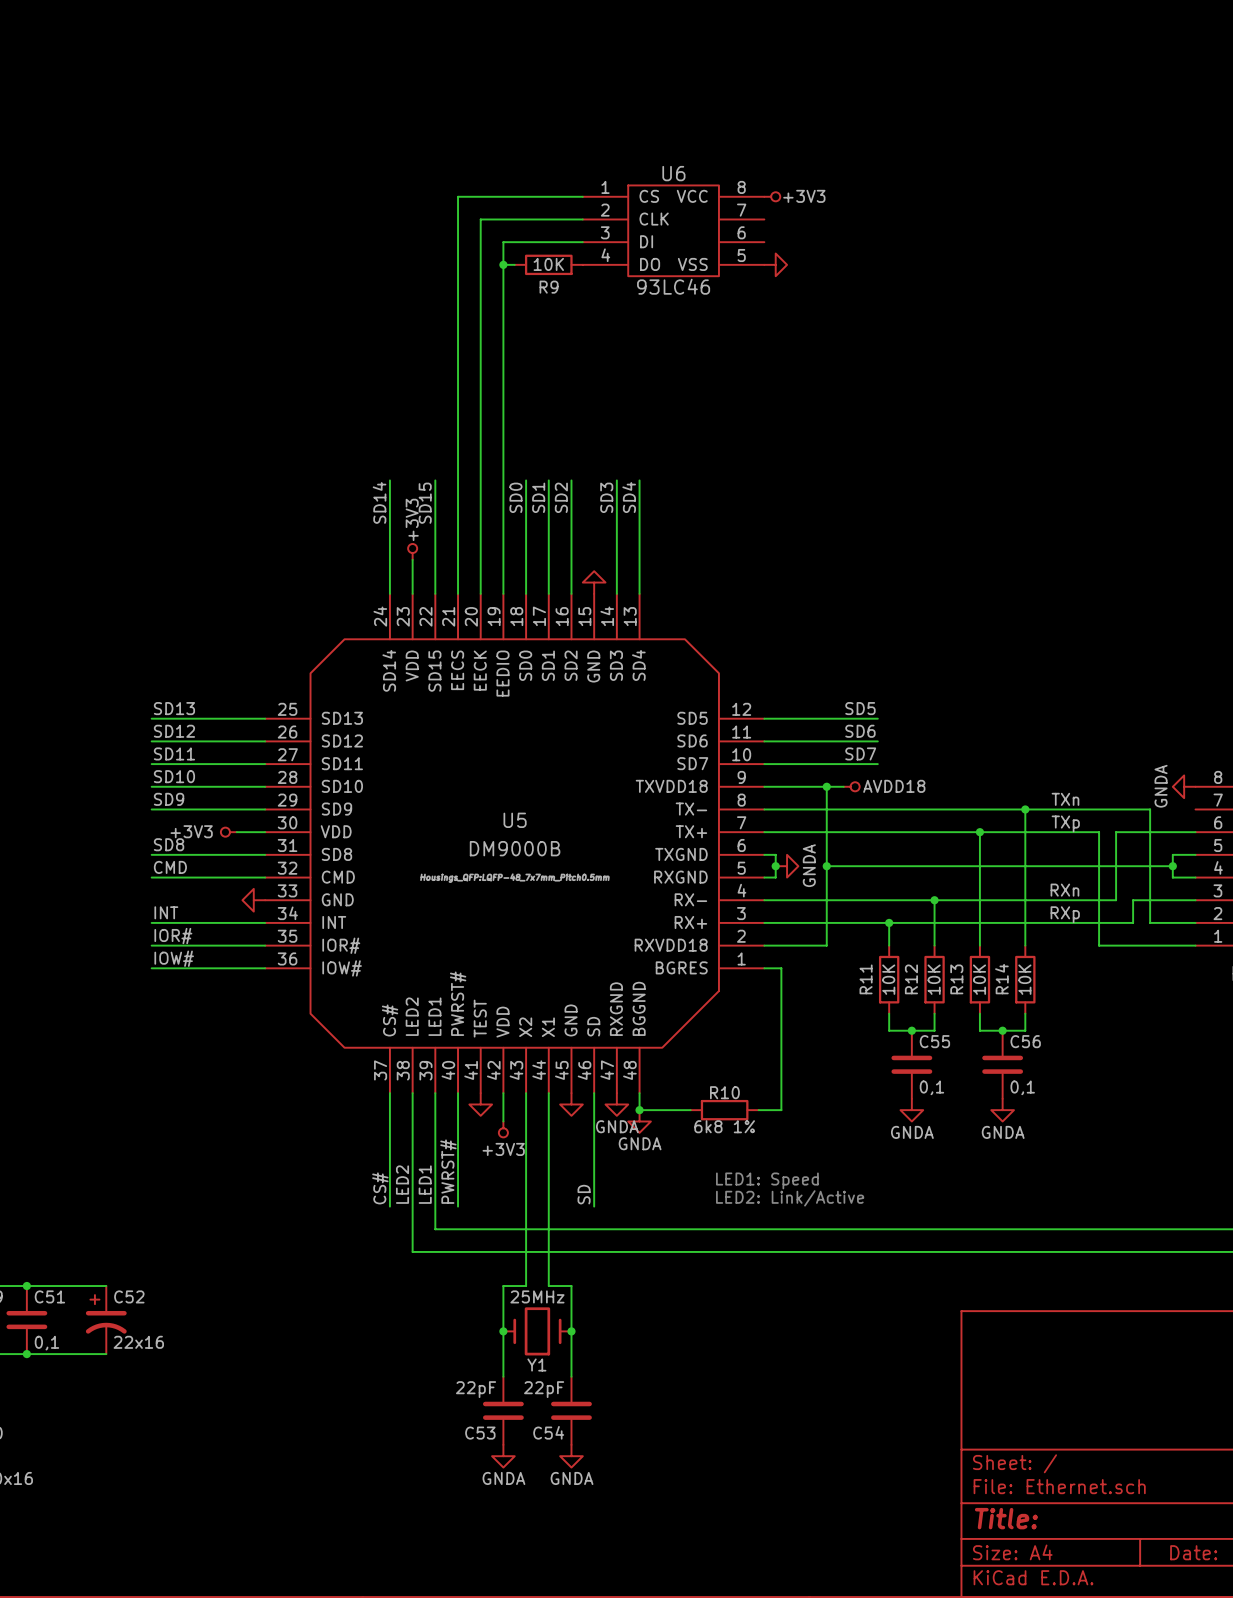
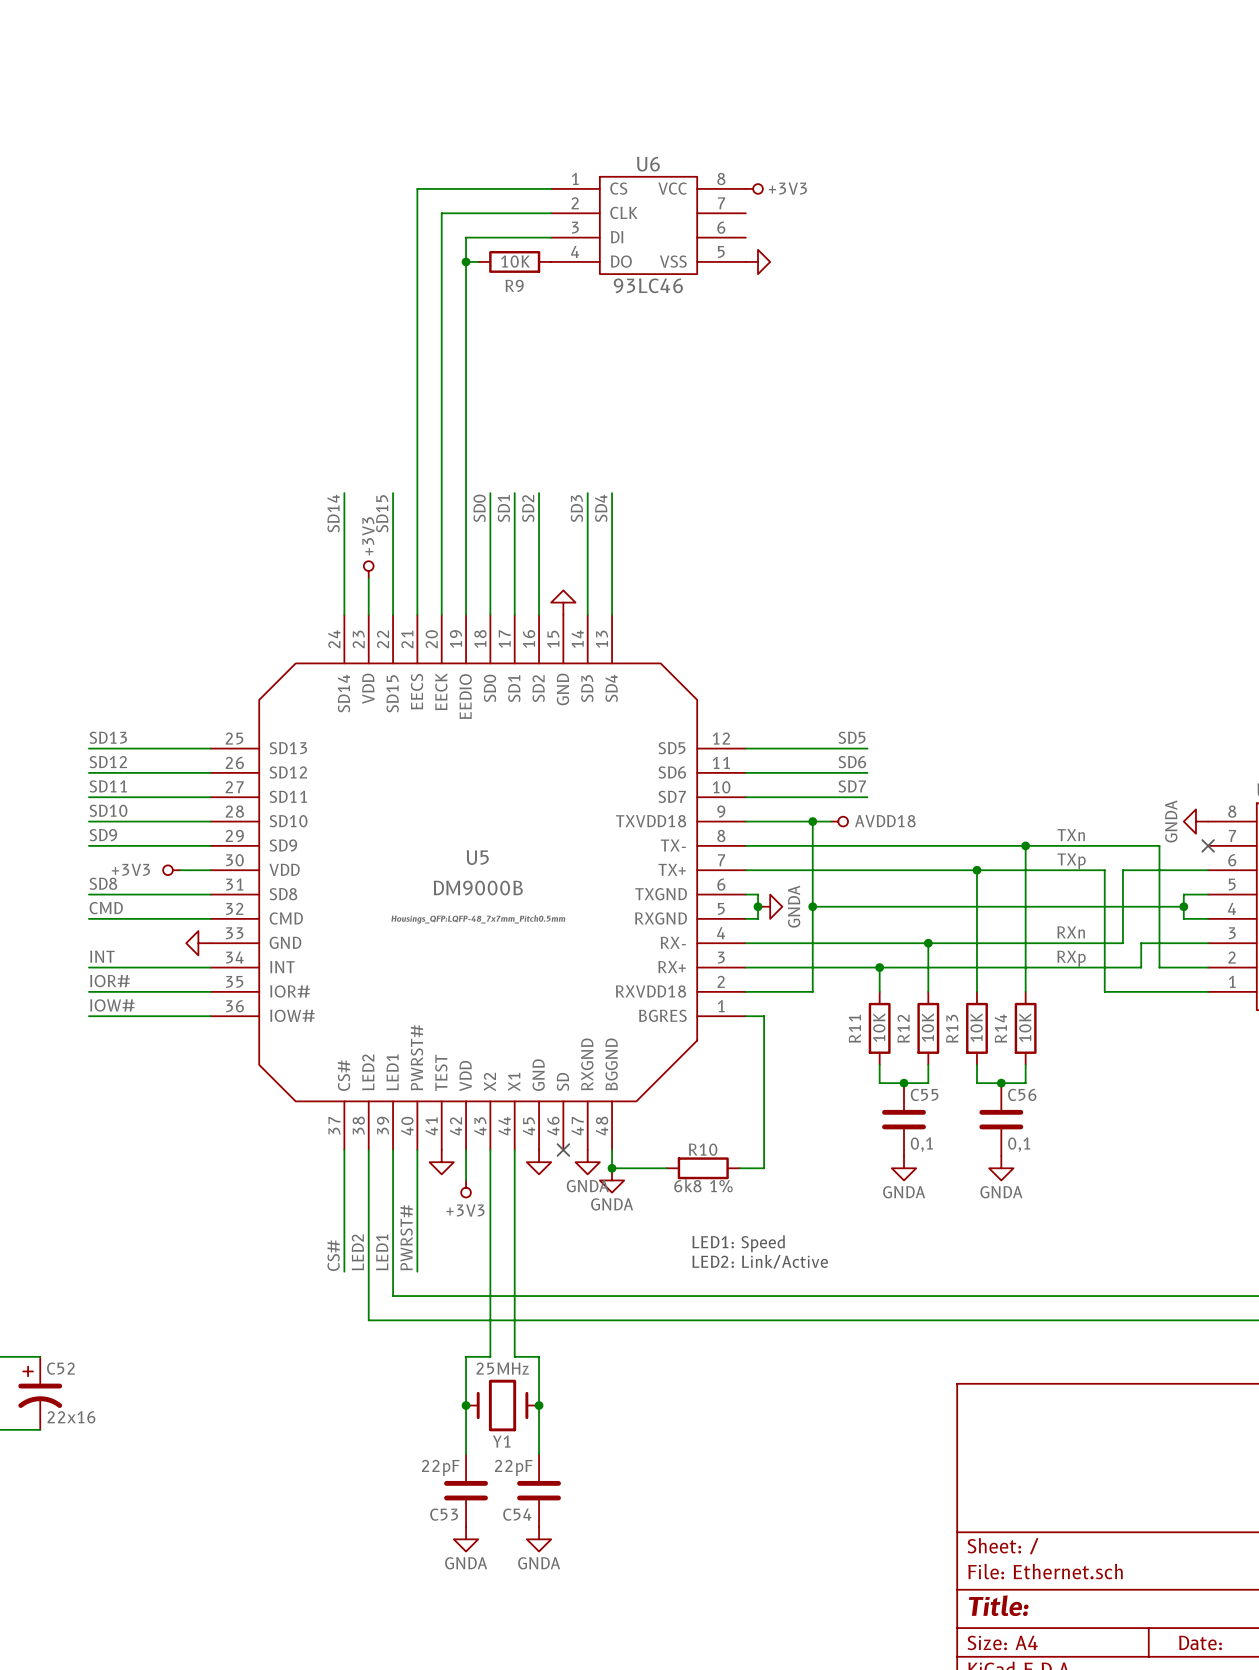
no-connect mark: none -> (1208, 845)
wire: (594, 1093) (594, 1206) -> none
no-connect mark: none -> (563, 1150)
label: SD (584, 1194) -> none

